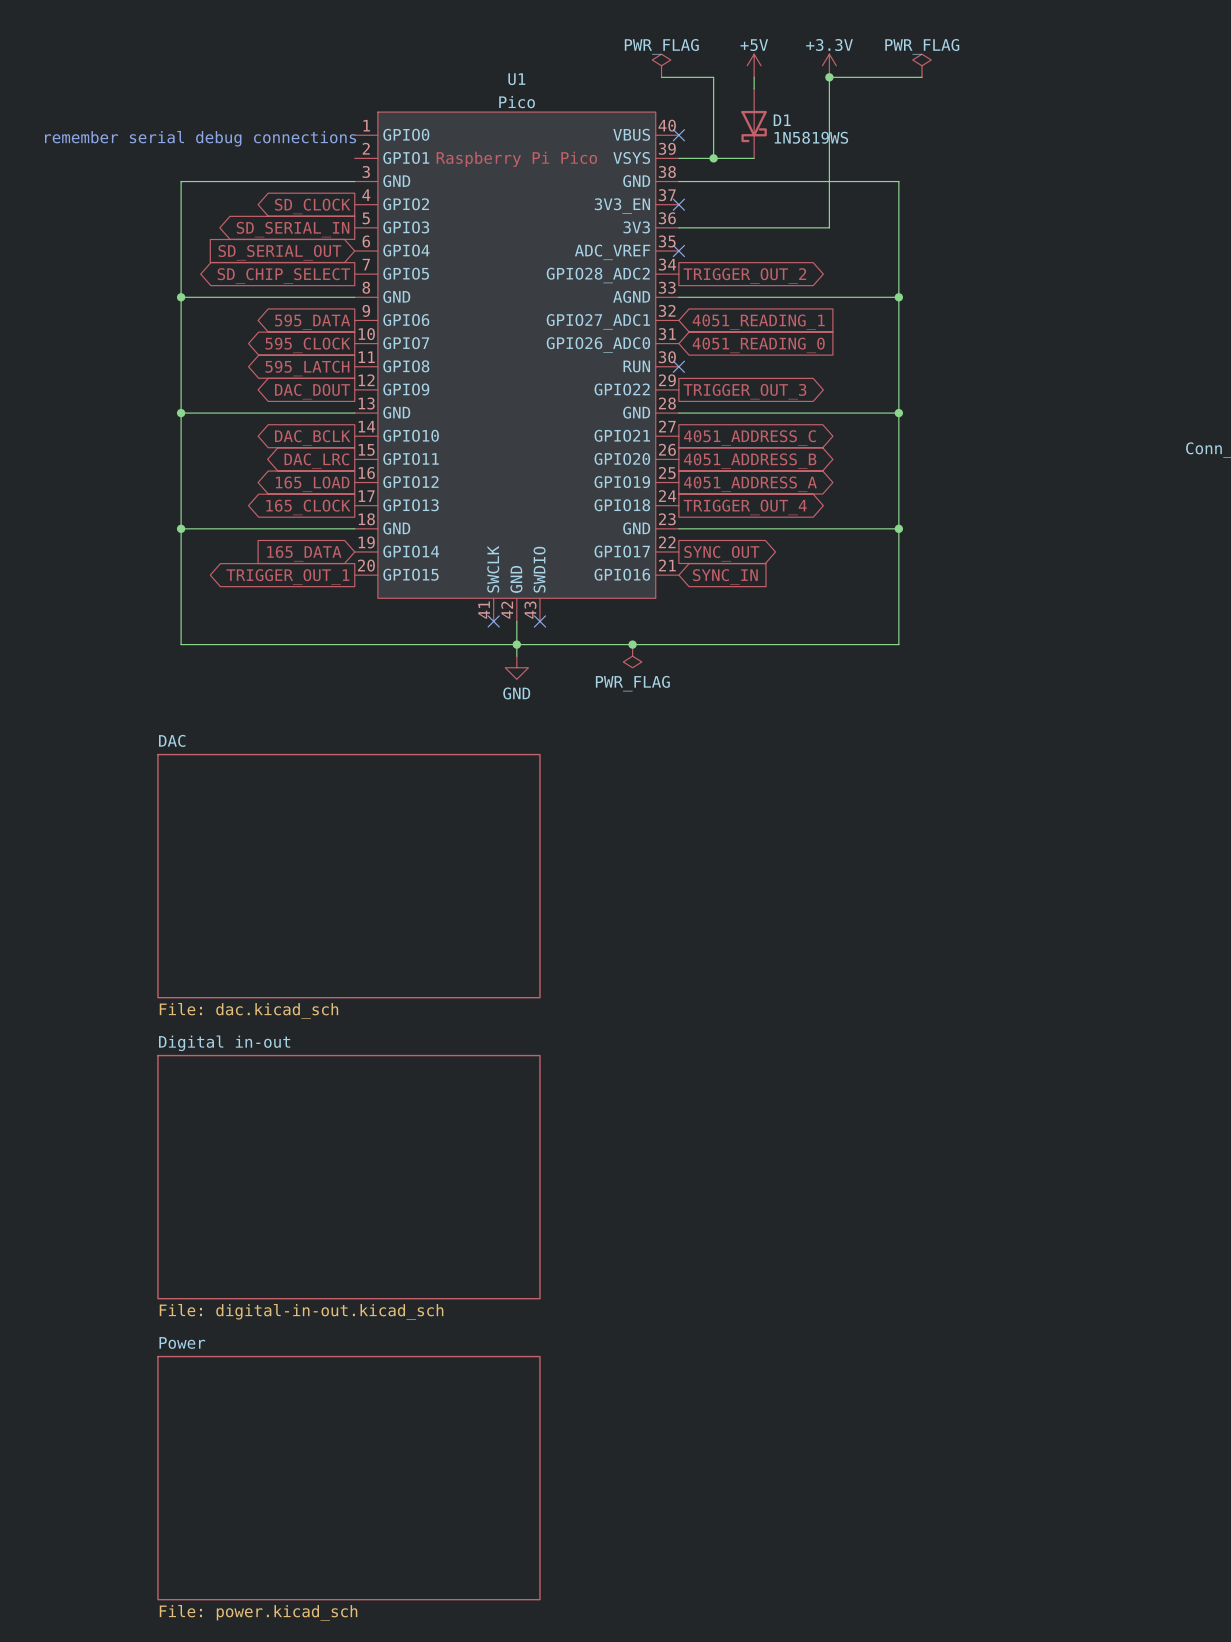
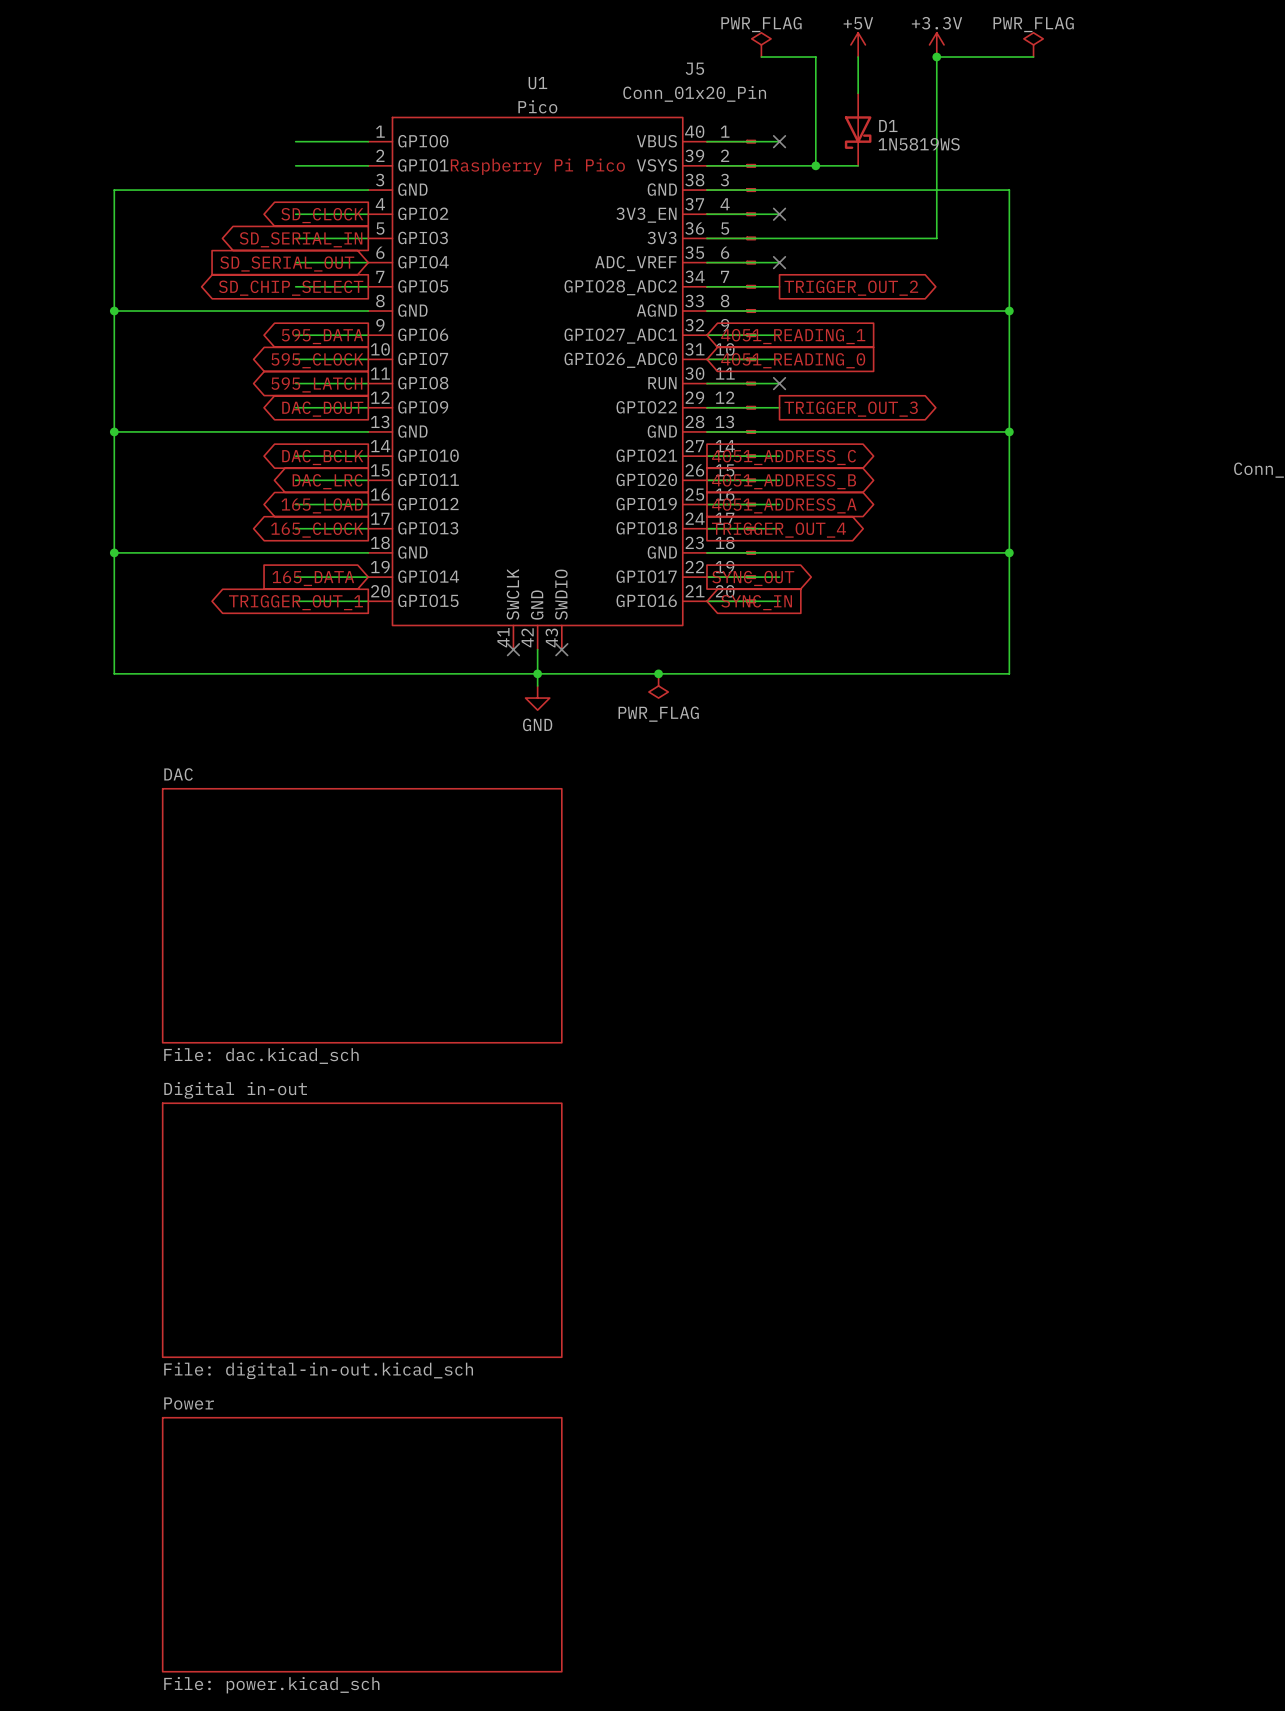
wire: none -> (761, 57) (815, 57) (815, 165)
wire: none -> (858, 57) (858, 93)
junction: none -> (936, 57)
power symbol position: PWR_FLAG (661, 65) -> PWR_FLAG (761, 44)
power symbol position: +5V (754, 65) -> +5V (858, 44)
power symbol position: +3.3V (829, 65) -> +3.3V (936, 44)
power symbol position: PWR_FLAG (922, 65) -> PWR_FLAG (1033, 44)
wire: (661, 77) (713, 77) (713, 158) -> none
wire: (754, 77) (754, 88) -> none
junction: (829, 77) -> none
wire: (922, 77) (829, 77) (829, 227) -> (936, 238) (864, 238)
D1 position: (754, 123) -> (858, 129)
wire: none -> (706, 141) (779, 141)
no-connect mark: (678, 135) -> none
no-connect mark: none -> (779, 141)
text: remember serial debug connections (200, 138) -> none
wire: none -> (295, 165) (368, 165)
junction: (713, 158) -> none
wire: none -> (785, 165) (858, 165)
junction: none -> (815, 165)
wire: (181, 181) (181, 644) -> (186, 190) (114, 190) (114, 673) (186, 673)
wire: none -> (295, 214) (368, 214)
wire: none -> (706, 214) (779, 214)
no-connect mark: (678, 204) -> none
no-connect mark: none -> (779, 214)
wire: none -> (295, 238) (368, 238)
wire: (898, 227) (898, 644) -> (1033, 57) (936, 57) (936, 190) (1009, 190) (1009, 673) (936, 673)
wire: none -> (295, 262) (368, 262)
wire: none -> (706, 262) (779, 262)
no-connect mark: (678, 250) -> none
no-connect mark: none -> (779, 262)
wire: none -> (295, 286) (368, 286)
wire: none -> (706, 286) (779, 286)
global label position: TRIGGER_OUT_2 (744, 275) -> TRIGGER_OUT_2 (851, 288)
wire: none -> (114, 311) (186, 311)
junction: none -> (114, 311)
junction: (181, 297) -> none
wire: none -> (936, 311) (1009, 311)
junction: (898, 297) -> none
junction: none -> (1009, 311)
wire: none -> (295, 335) (368, 335)
wire: none -> (706, 335) (779, 335)
wire: none -> (295, 359) (368, 359)
wire: none -> (706, 359) (779, 359)
J5: none -> Conn_01x20_Pin (731, 371)
wire: none -> (295, 383) (368, 383)
wire: none -> (706, 383) (779, 383)
no-connect mark: (678, 366) -> none
no-connect mark: none -> (779, 383)
wire: none -> (295, 407) (368, 407)
wire: none -> (706, 407) (779, 407)
global label position: TRIGGER_OUT_3 (744, 391) -> TRIGGER_OUT_3 (851, 409)
wire: none -> (114, 431) (186, 431)
junction: none -> (114, 431)
junction: (181, 413) -> none
wire: none -> (936, 431) (1009, 431)
junction: (898, 413) -> none
junction: none -> (1009, 431)
wire: none -> (295, 456) (368, 456)
wire: none -> (706, 456) (779, 456)
wire: none -> (295, 480) (368, 480)
wire: none -> (706, 480) (779, 480)
wire: none -> (295, 504) (368, 504)
wire: none -> (706, 504) (779, 504)
wire: none -> (295, 528) (368, 528)
wire: none -> (706, 528) (779, 528)
wire: none -> (114, 552) (186, 552)
junction: none -> (114, 552)
junction: (181, 528) -> none
wire: none -> (936, 552) (1009, 552)
junction: (898, 528) -> none
junction: none -> (1009, 552)
wire: none -> (295, 577) (368, 577)
wire: none -> (706, 577) (779, 577)
wire: none -> (295, 601) (368, 601)
wire: none -> (706, 601) (779, 601)

